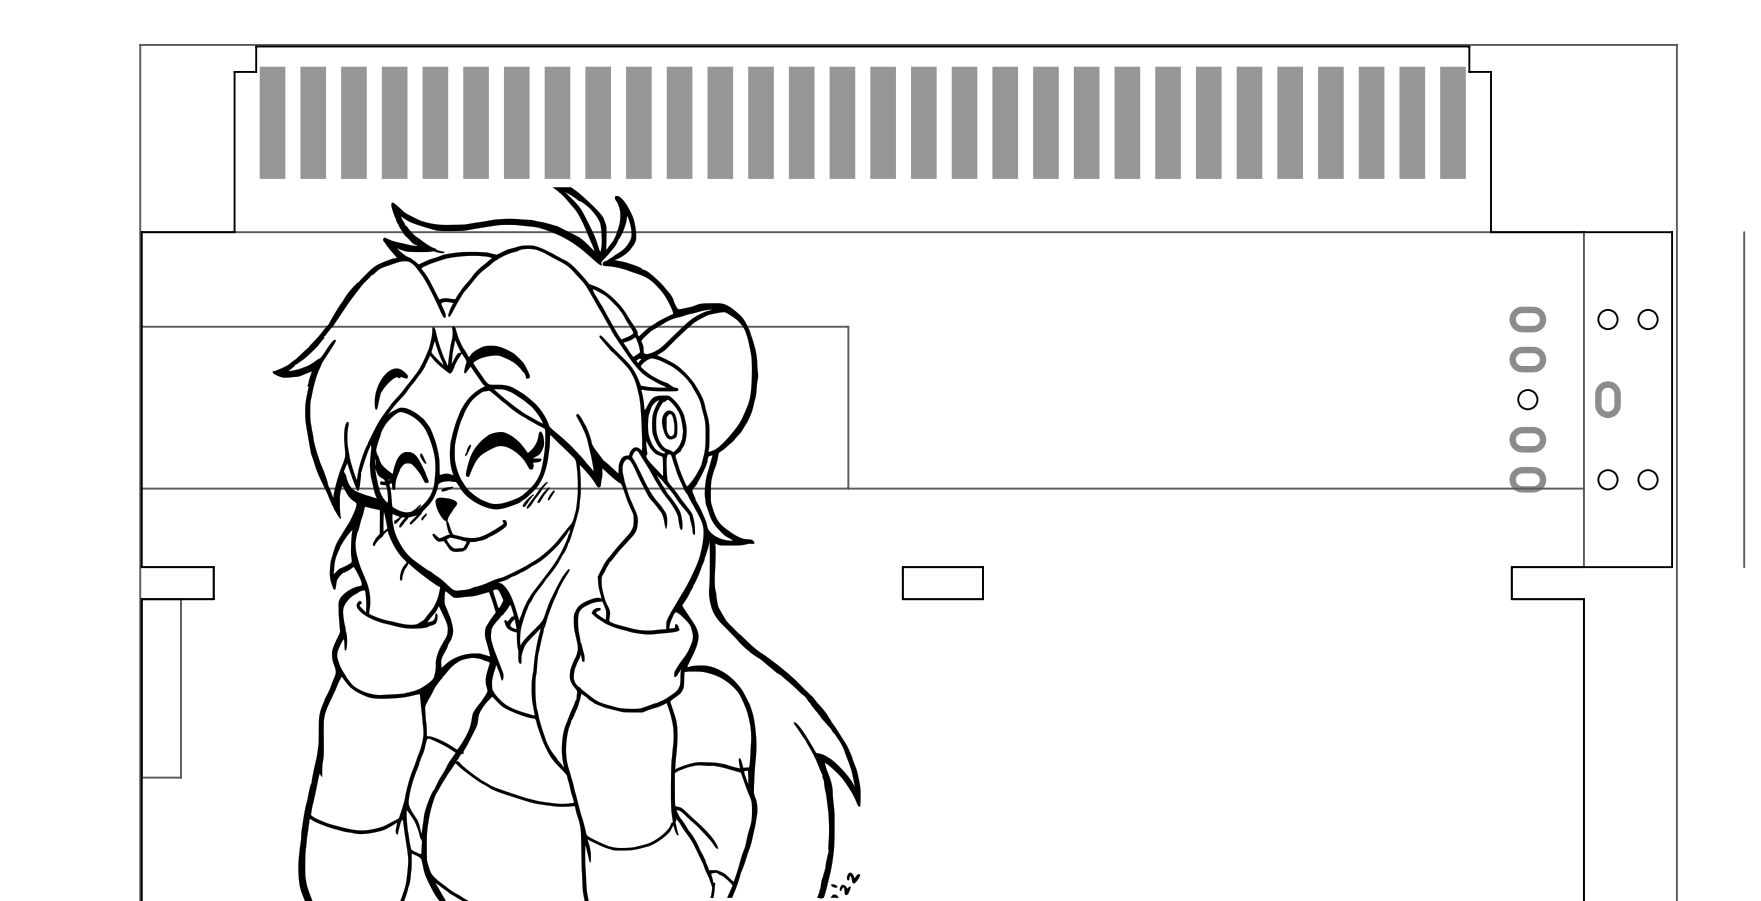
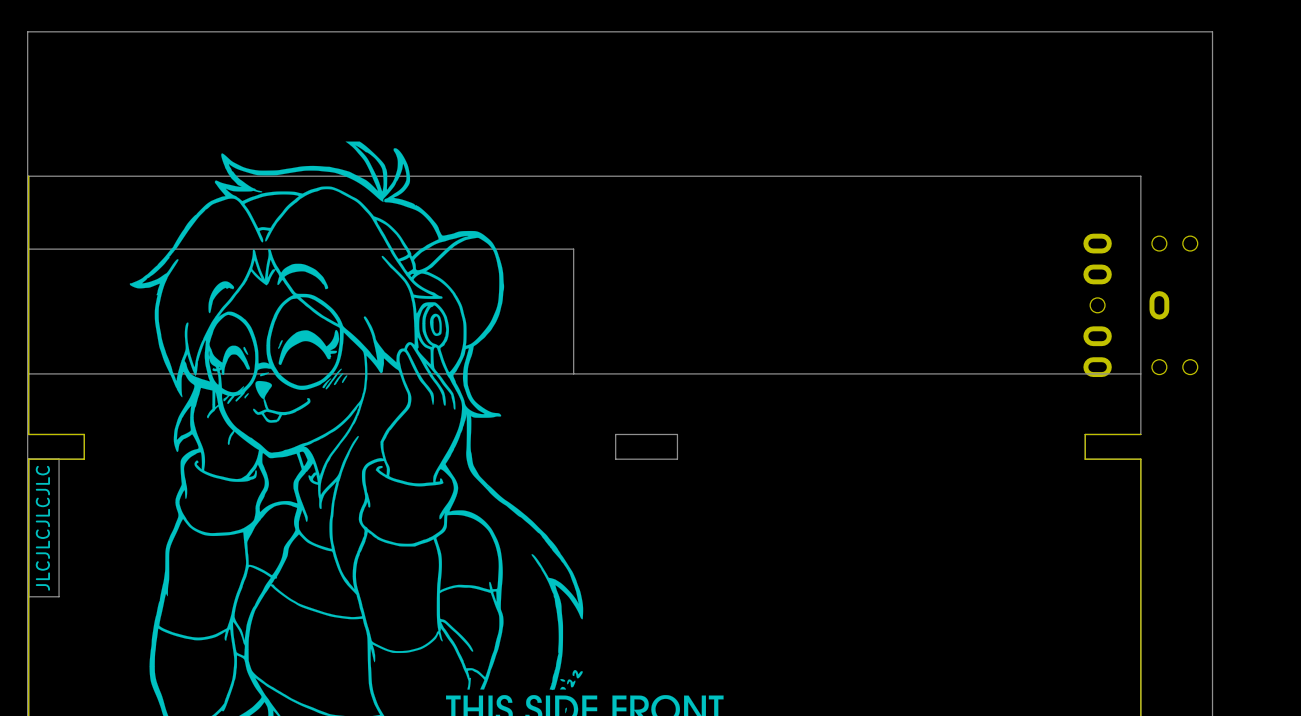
part: (862, 139) -> none
board edge: (1583, 232) (1672, 232) (1672, 567) (1583, 567) -> none
line: (1744, 232) (1744, 567) -> none
board edge: (902, 567) (902, 599) (982, 599) (982, 567) (902, 567) -> none
text: none -> JLCJLCJLCJLC (42, 528)

